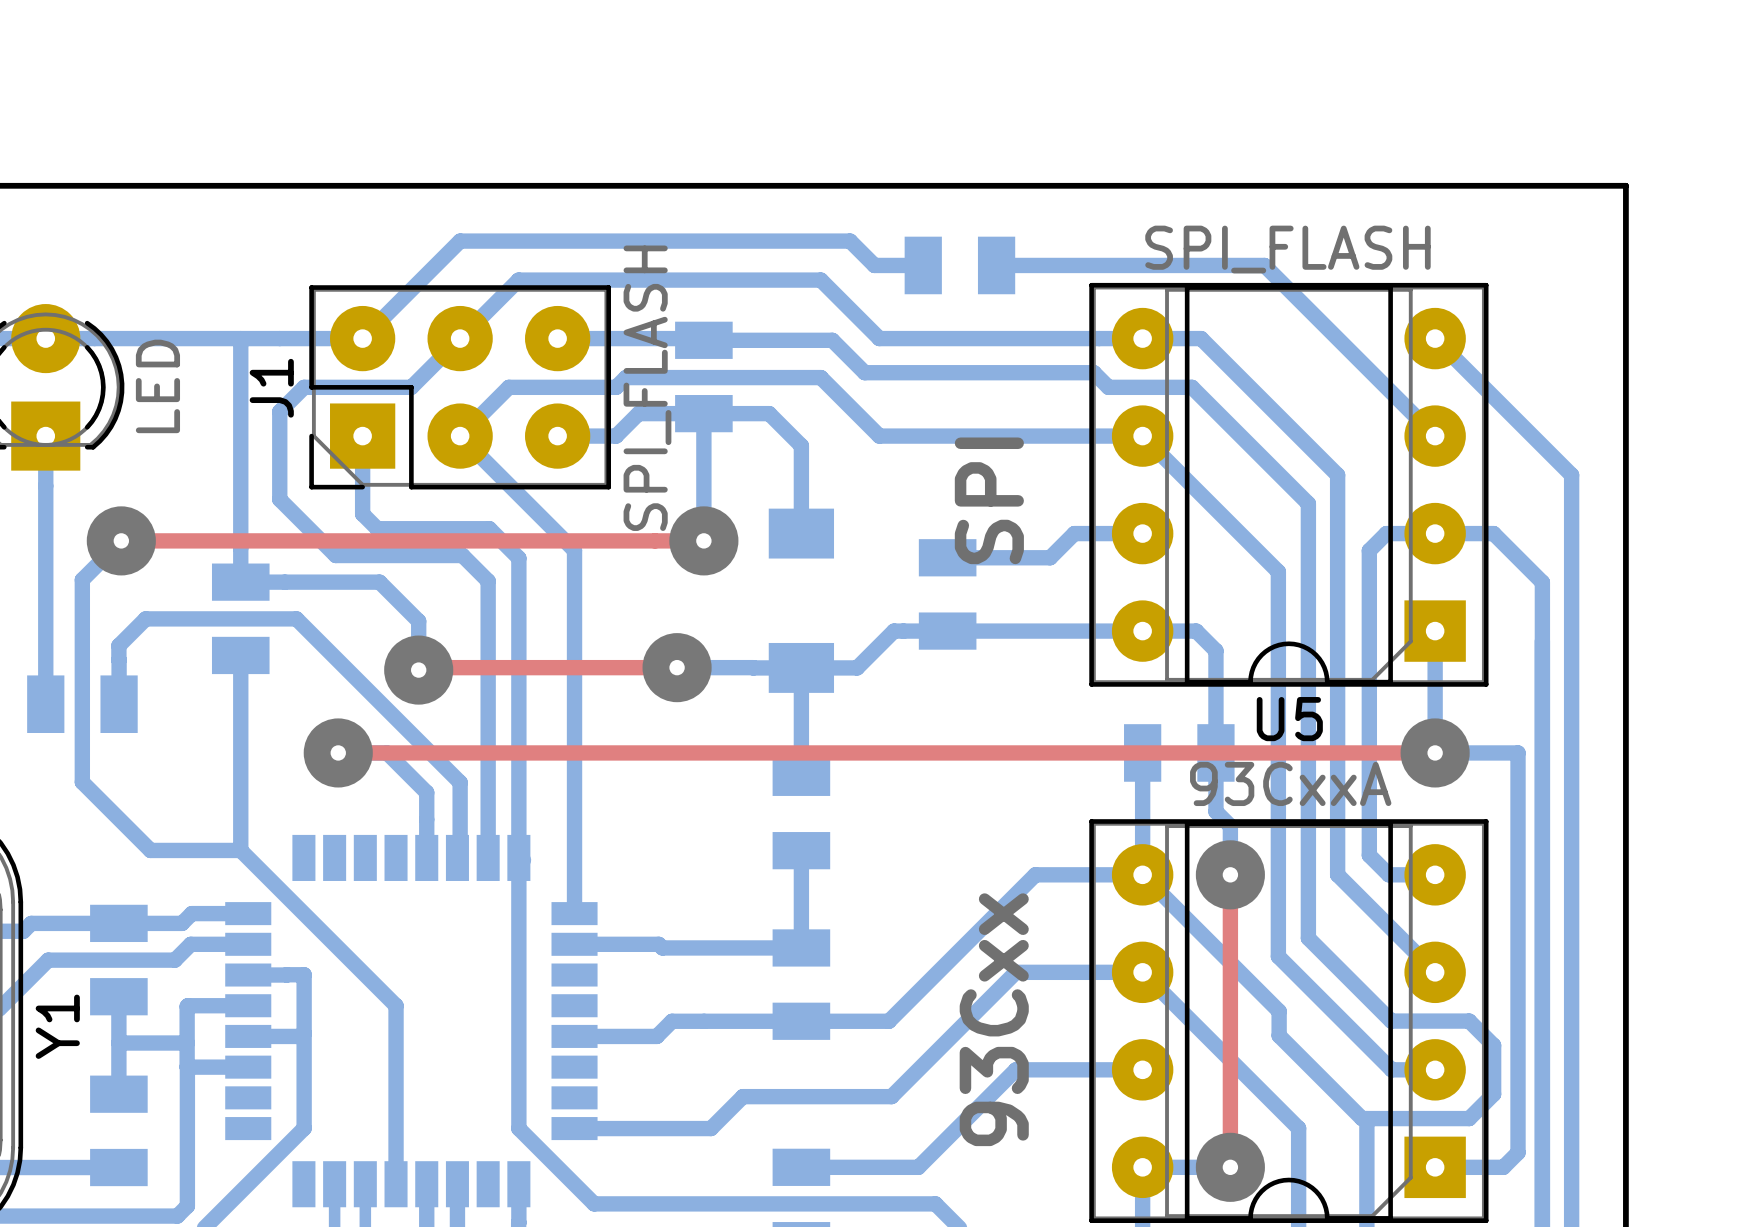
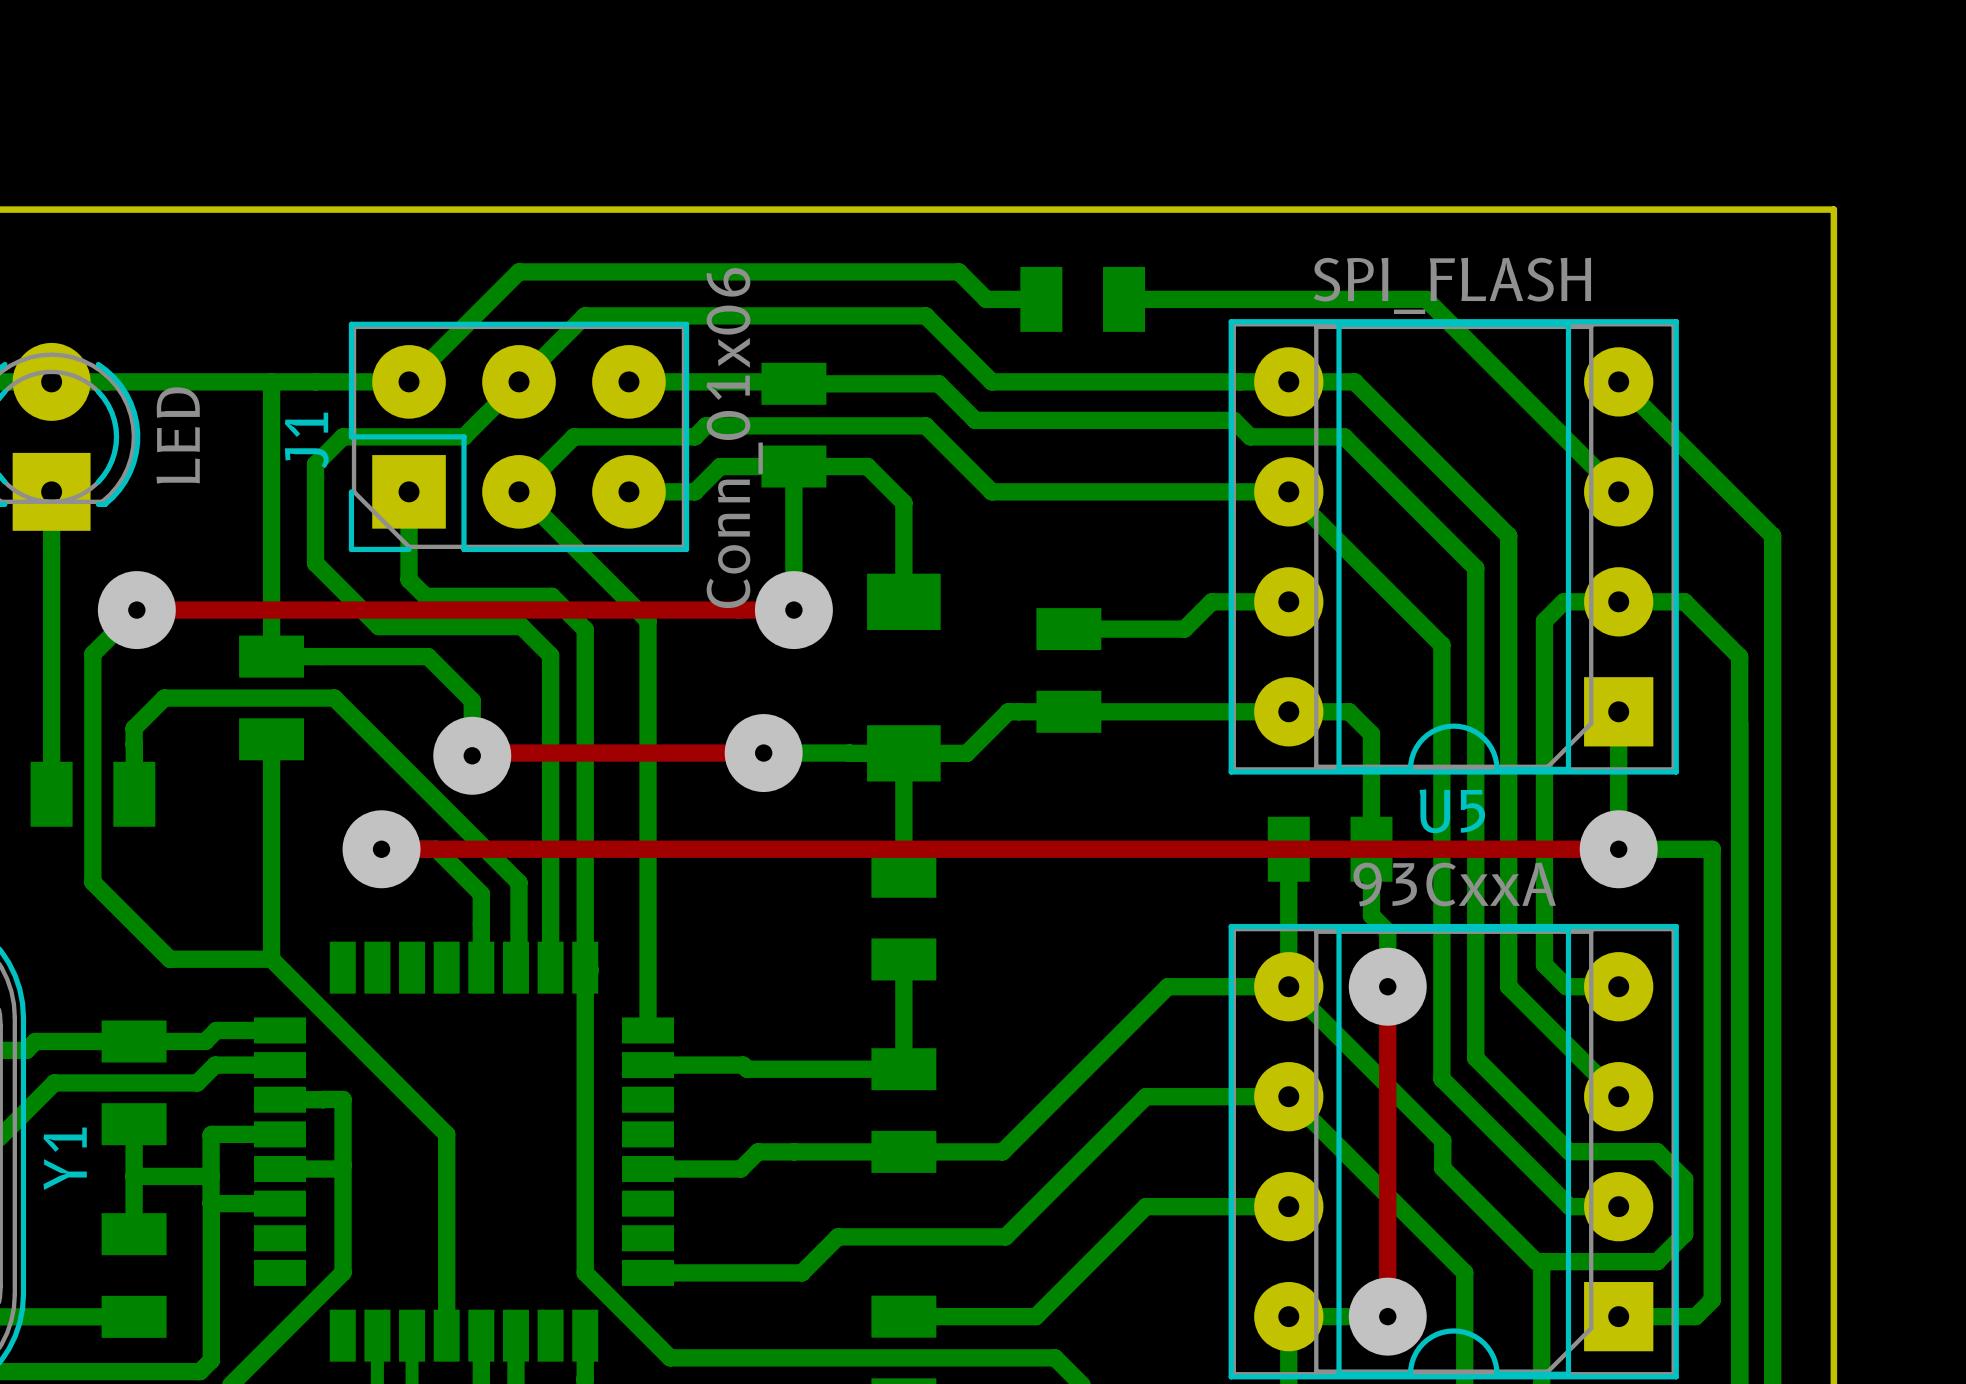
J1 value: SPI_FLASH (647, 388) -> Conn_01x06 (734, 438)
text: SPI (989, 500) -> none
text: 93Cxx (994, 1019) -> none

